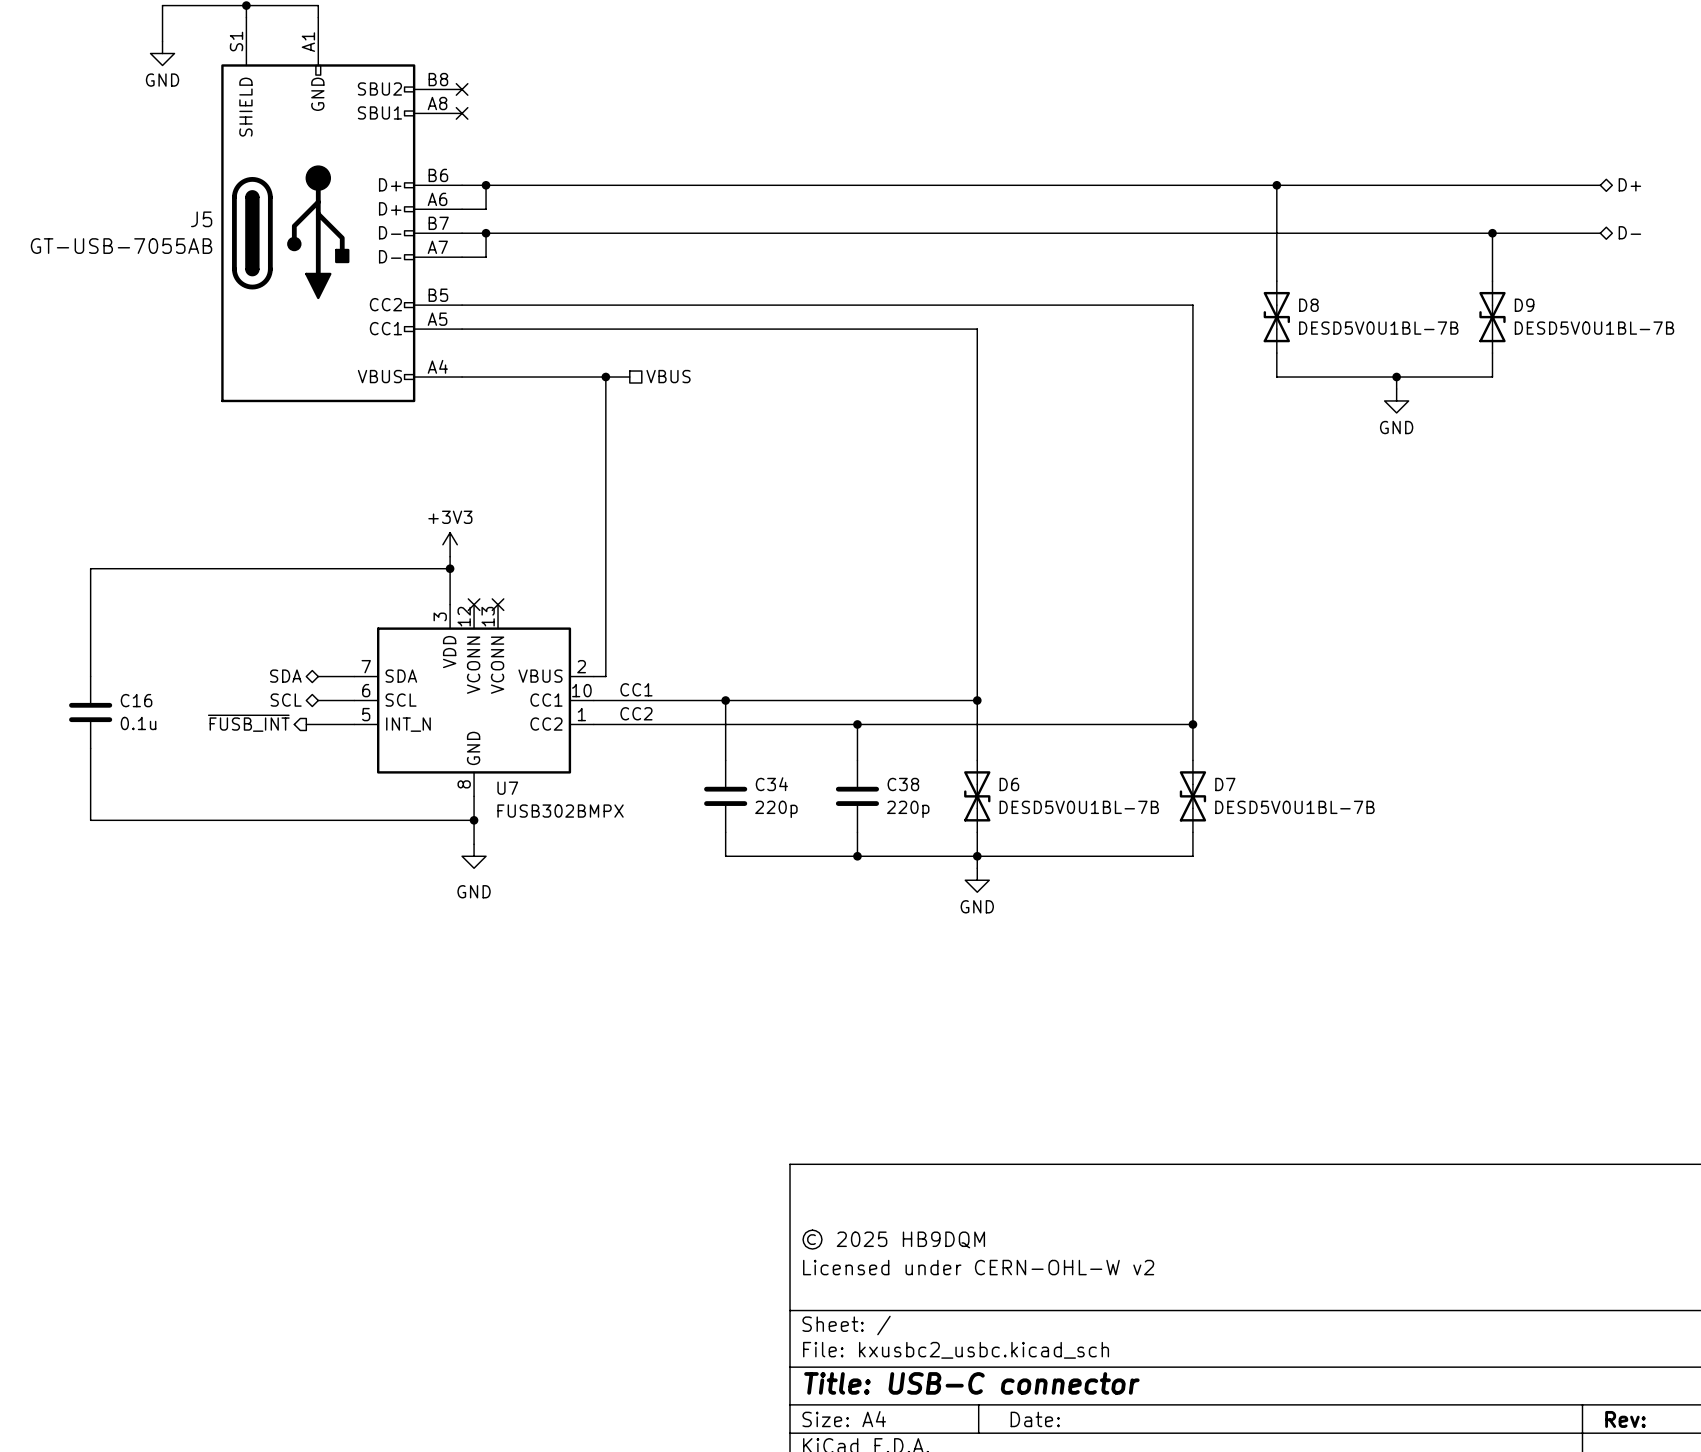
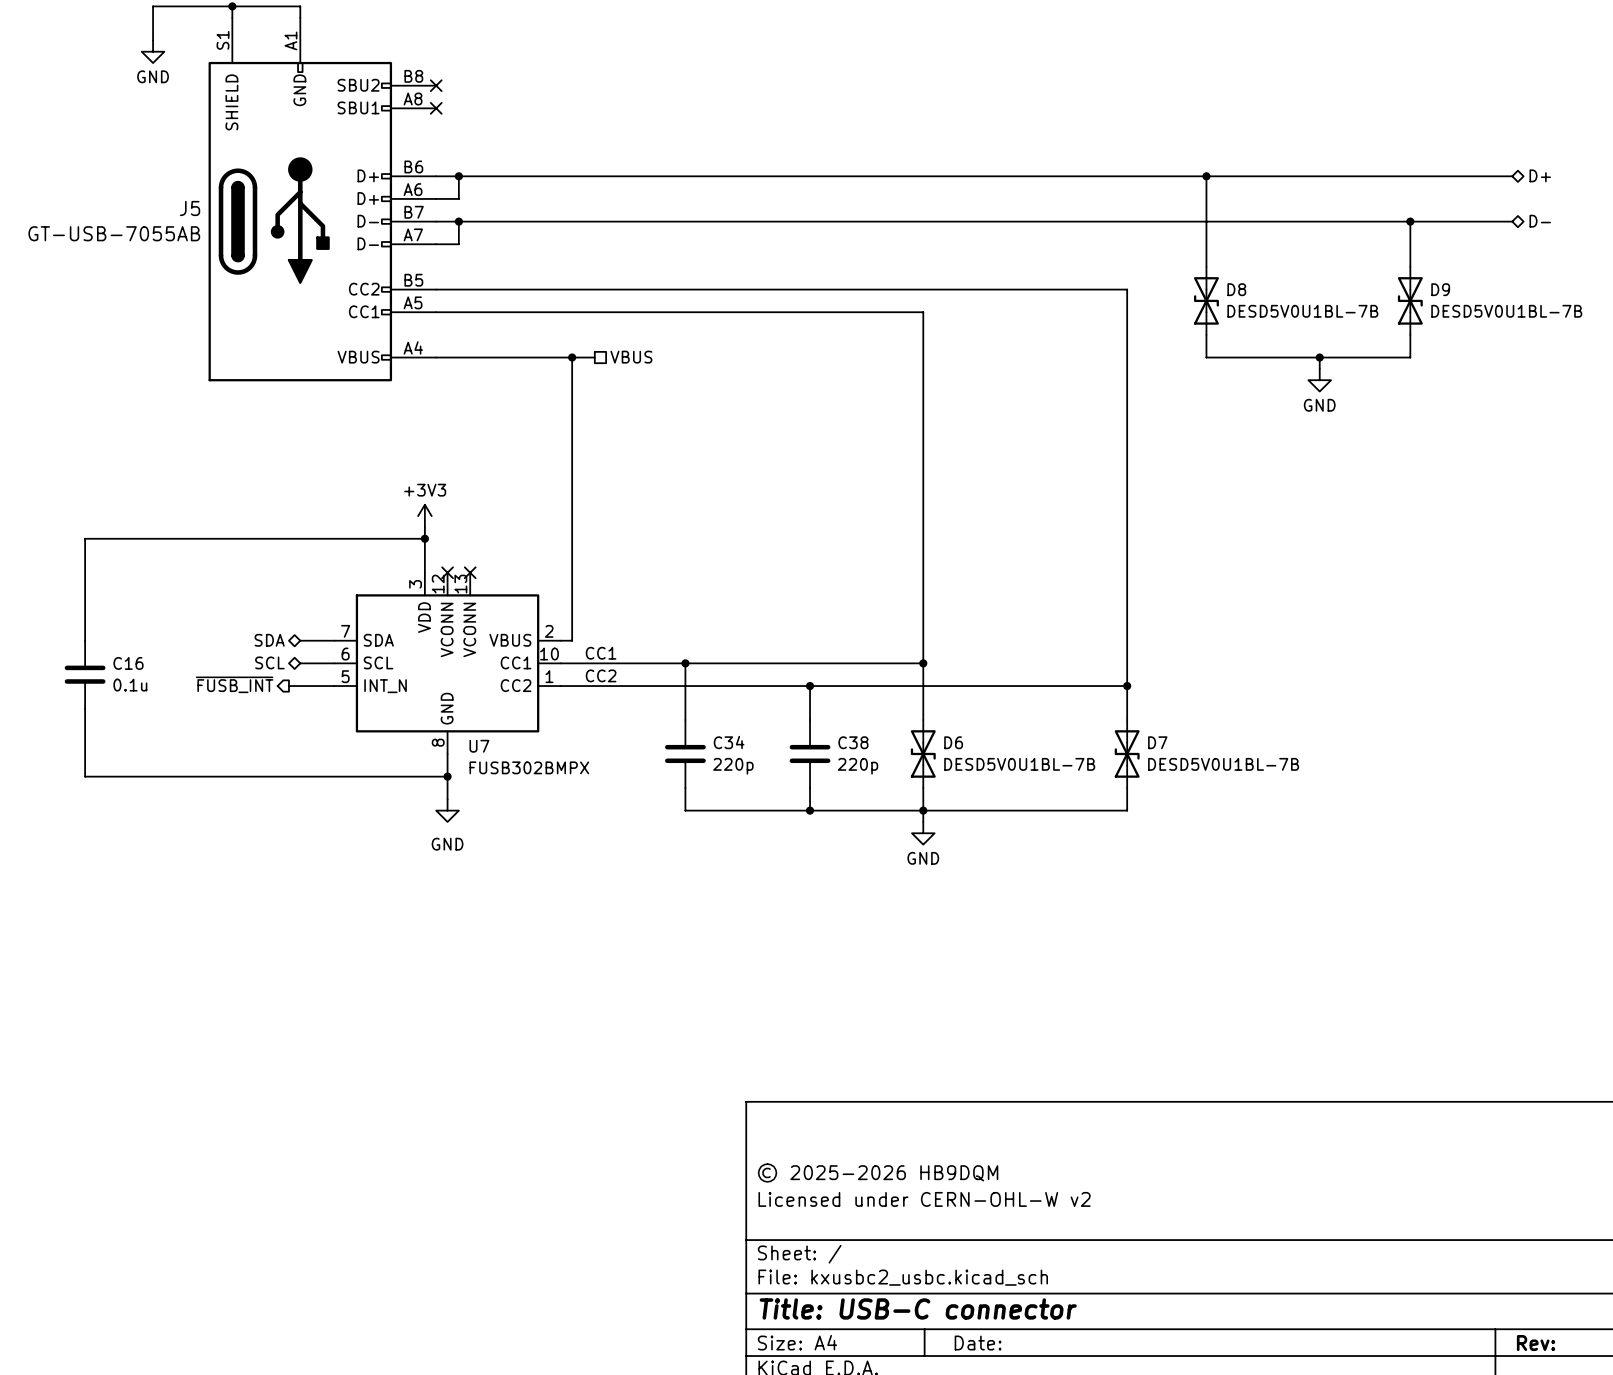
title block: © 2025 HB9DQM (893, 1239) -> © 2025-2026 HB9DQM (878, 1172)

